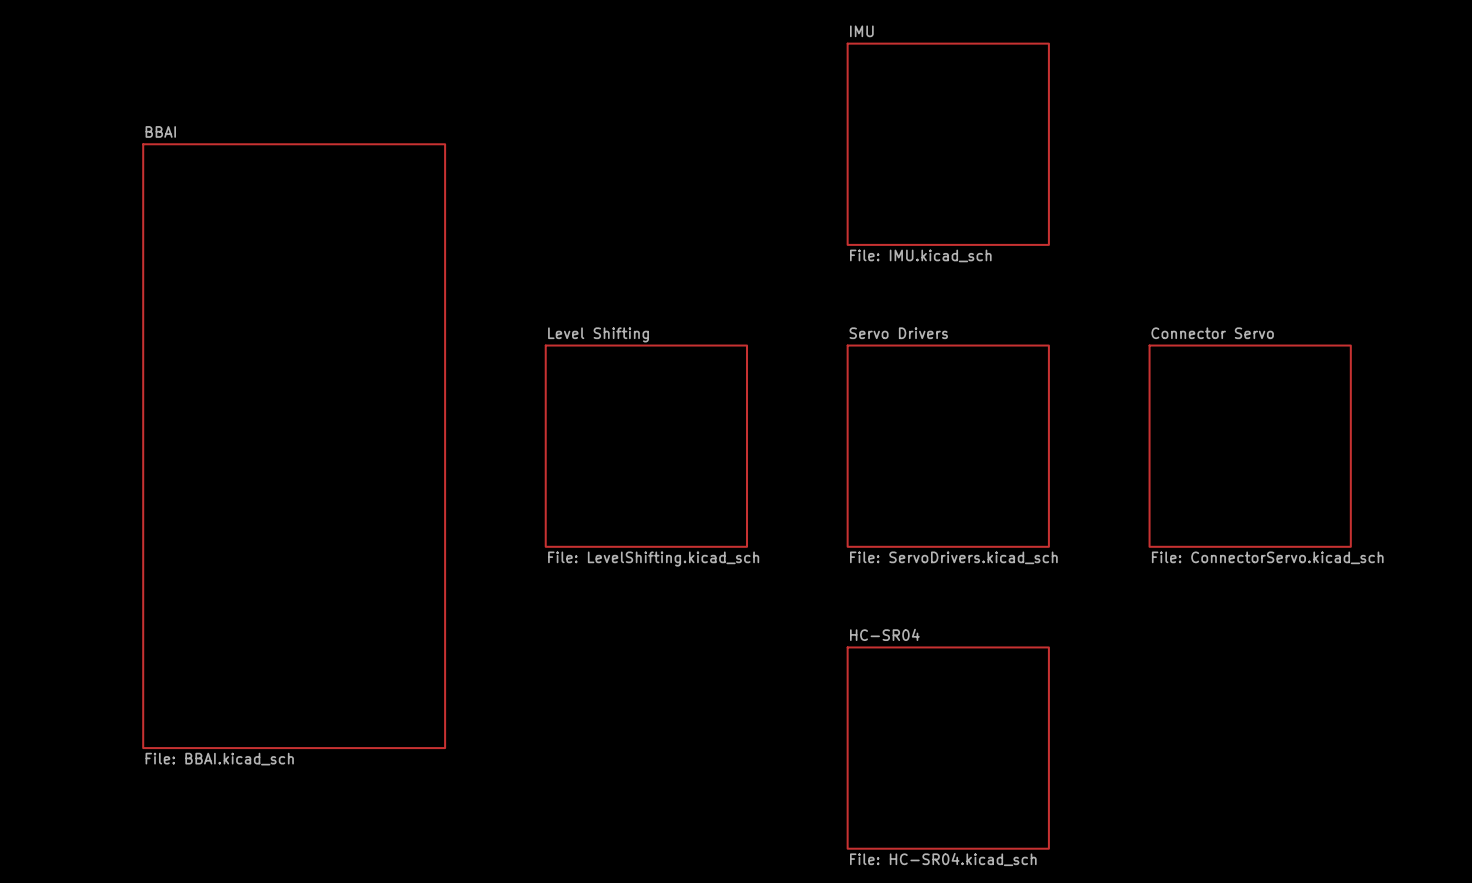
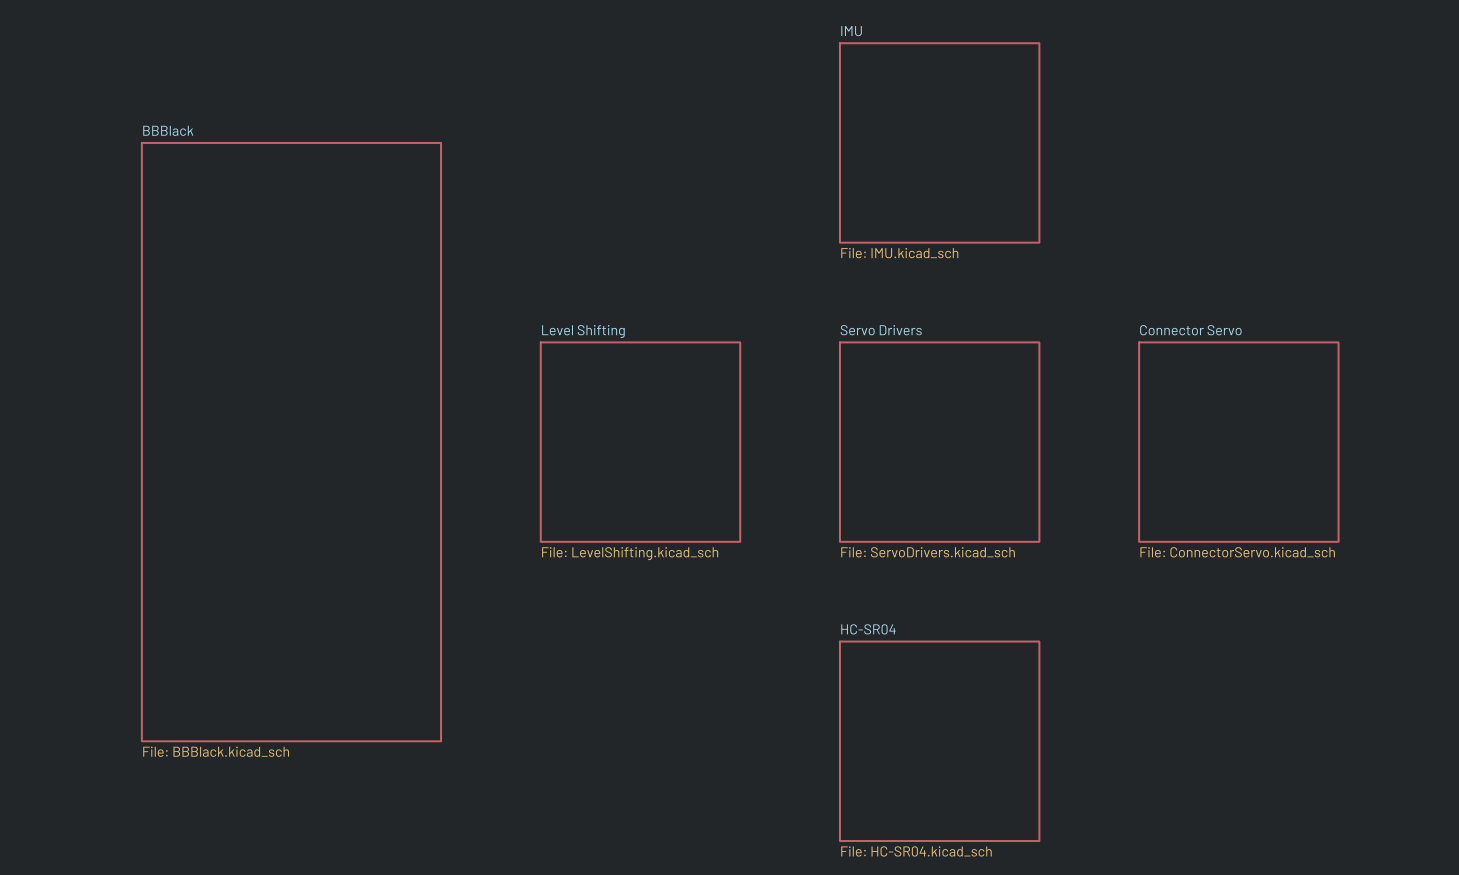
sheet BBAI name: BBAI (160, 131) -> BBBlack (168, 130)
sheet BBAI value: File: BBAI.kicad_sch (219, 759) -> File: BBBlack.kicad_sch (216, 751)

